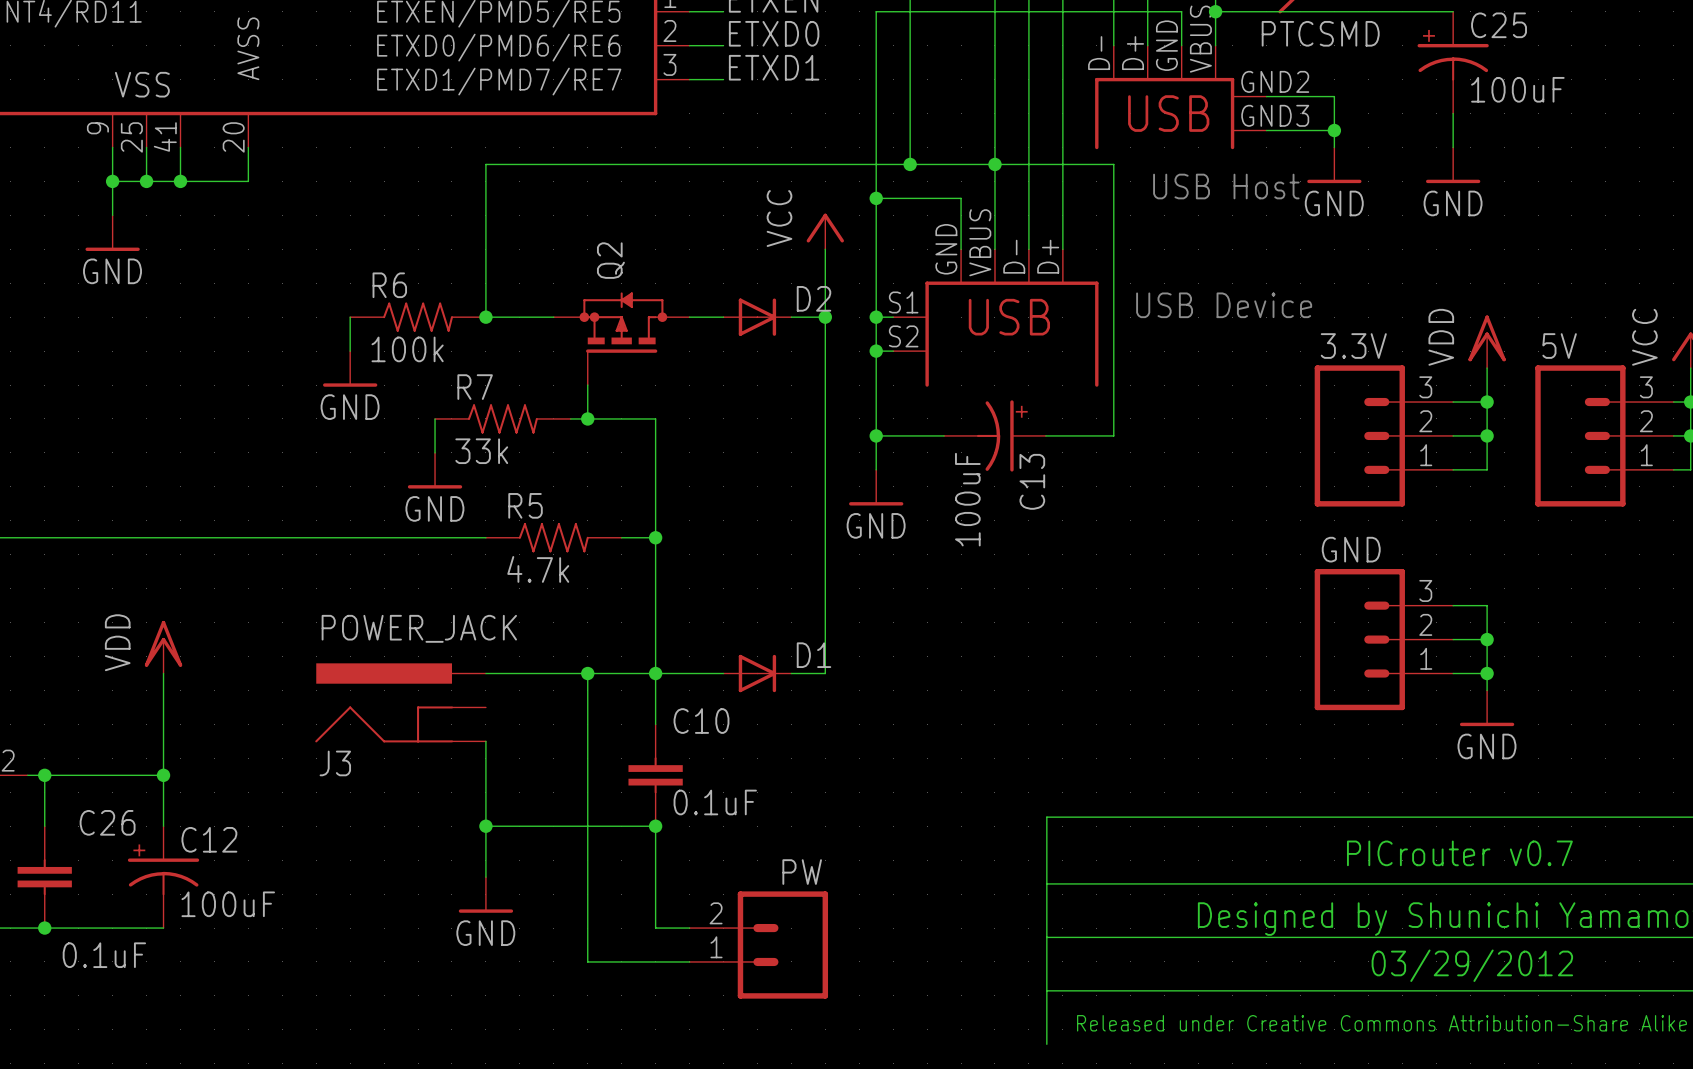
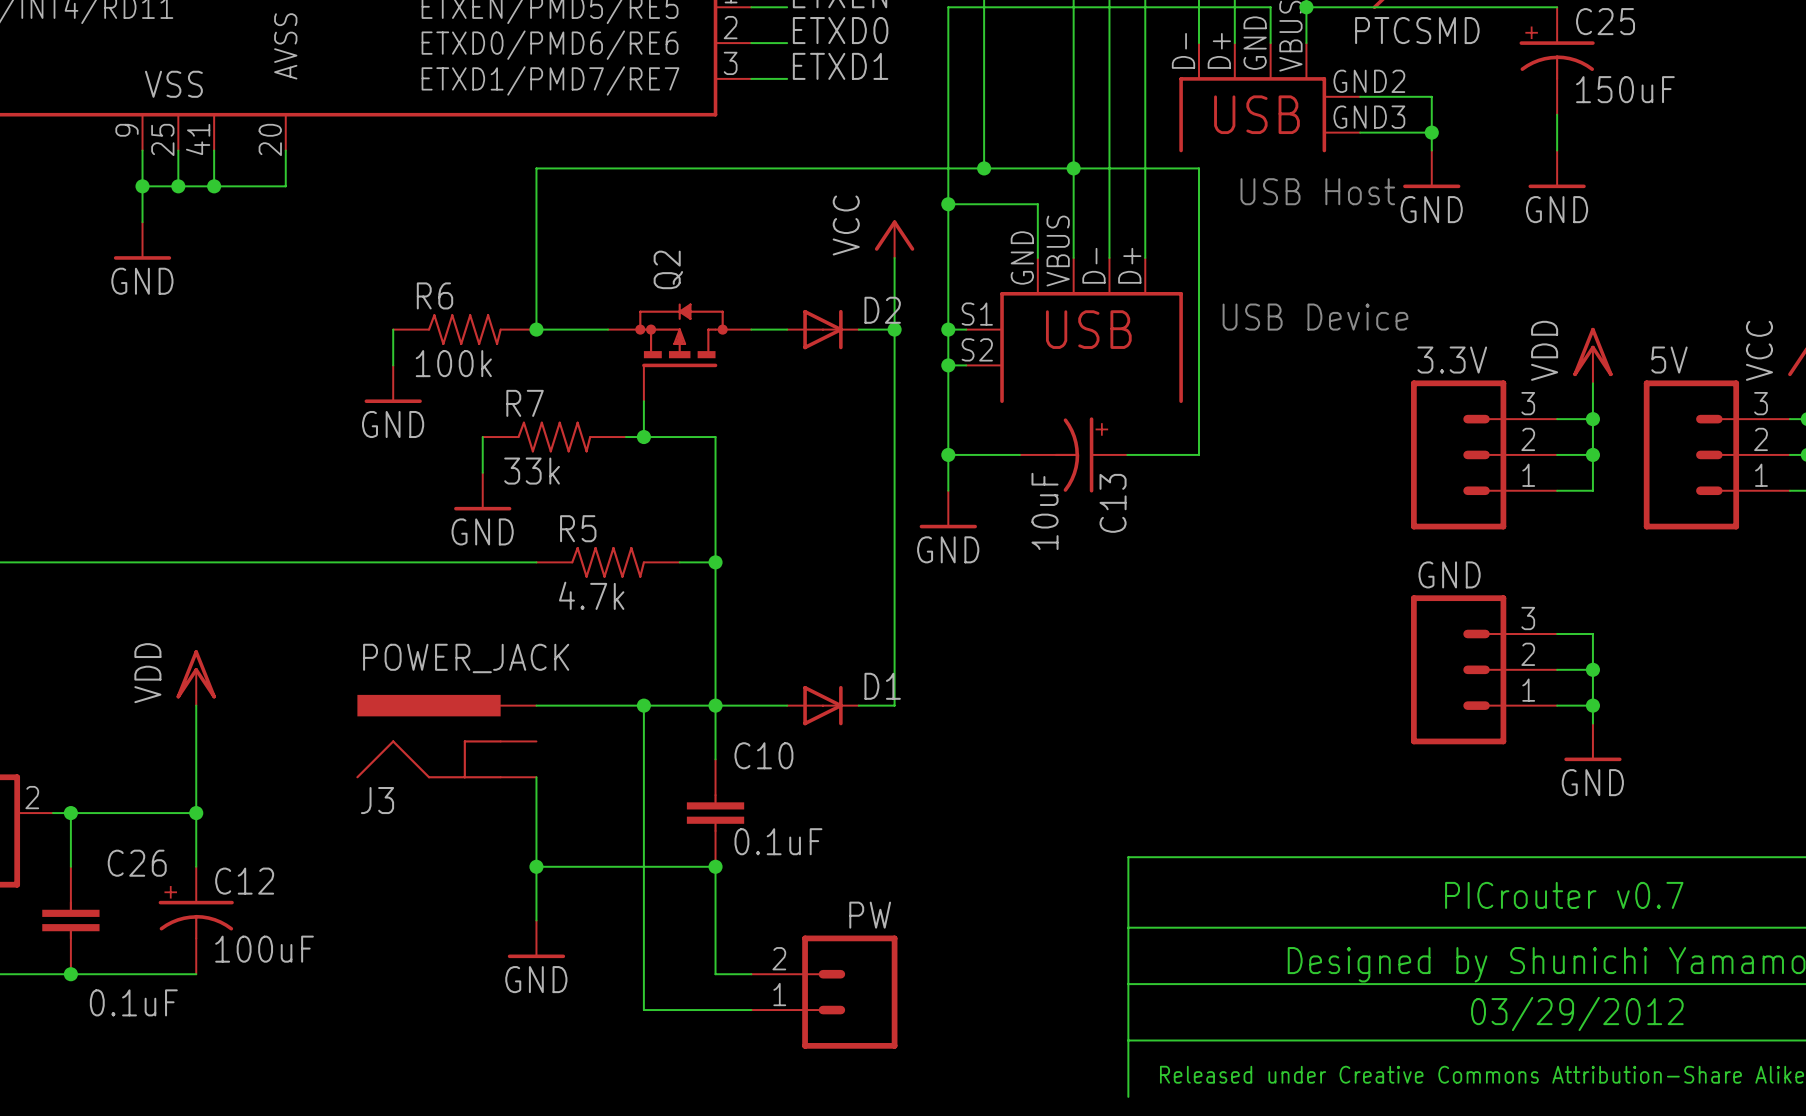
C25 value: 100uF (1517, 89) -> 150uF (1625, 89)
C13 value: 100uF (967, 499) -> 10uF (1045, 511)

